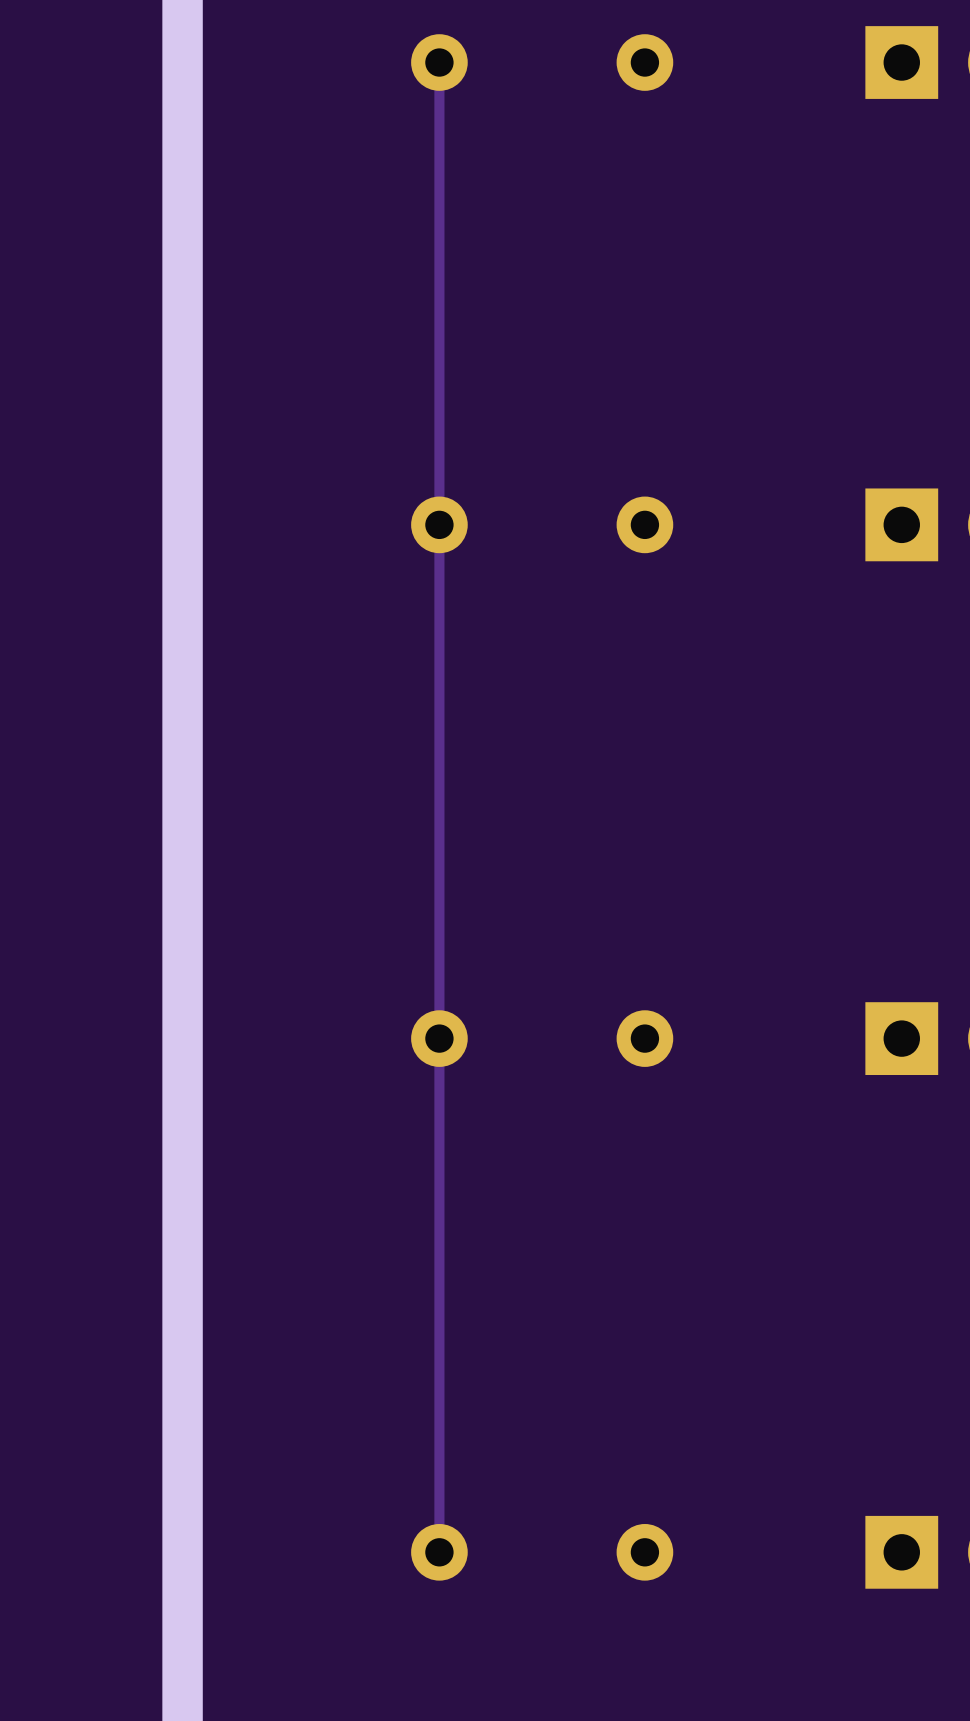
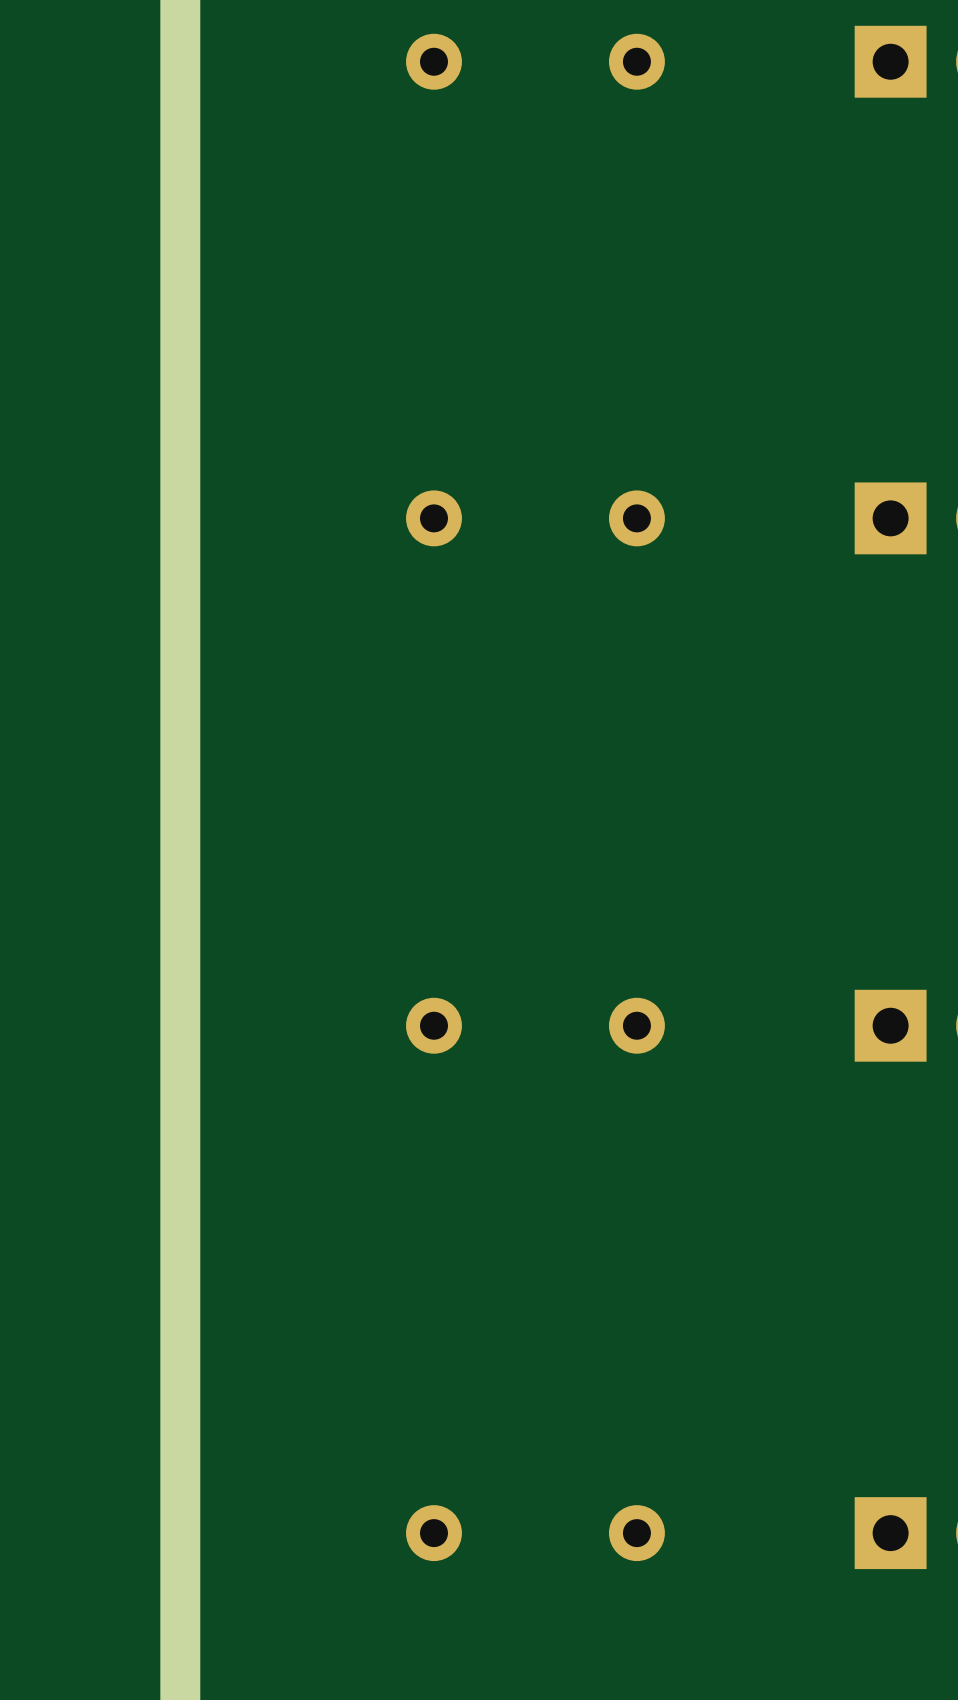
track: (439, 62) (439, 1552) -> none

